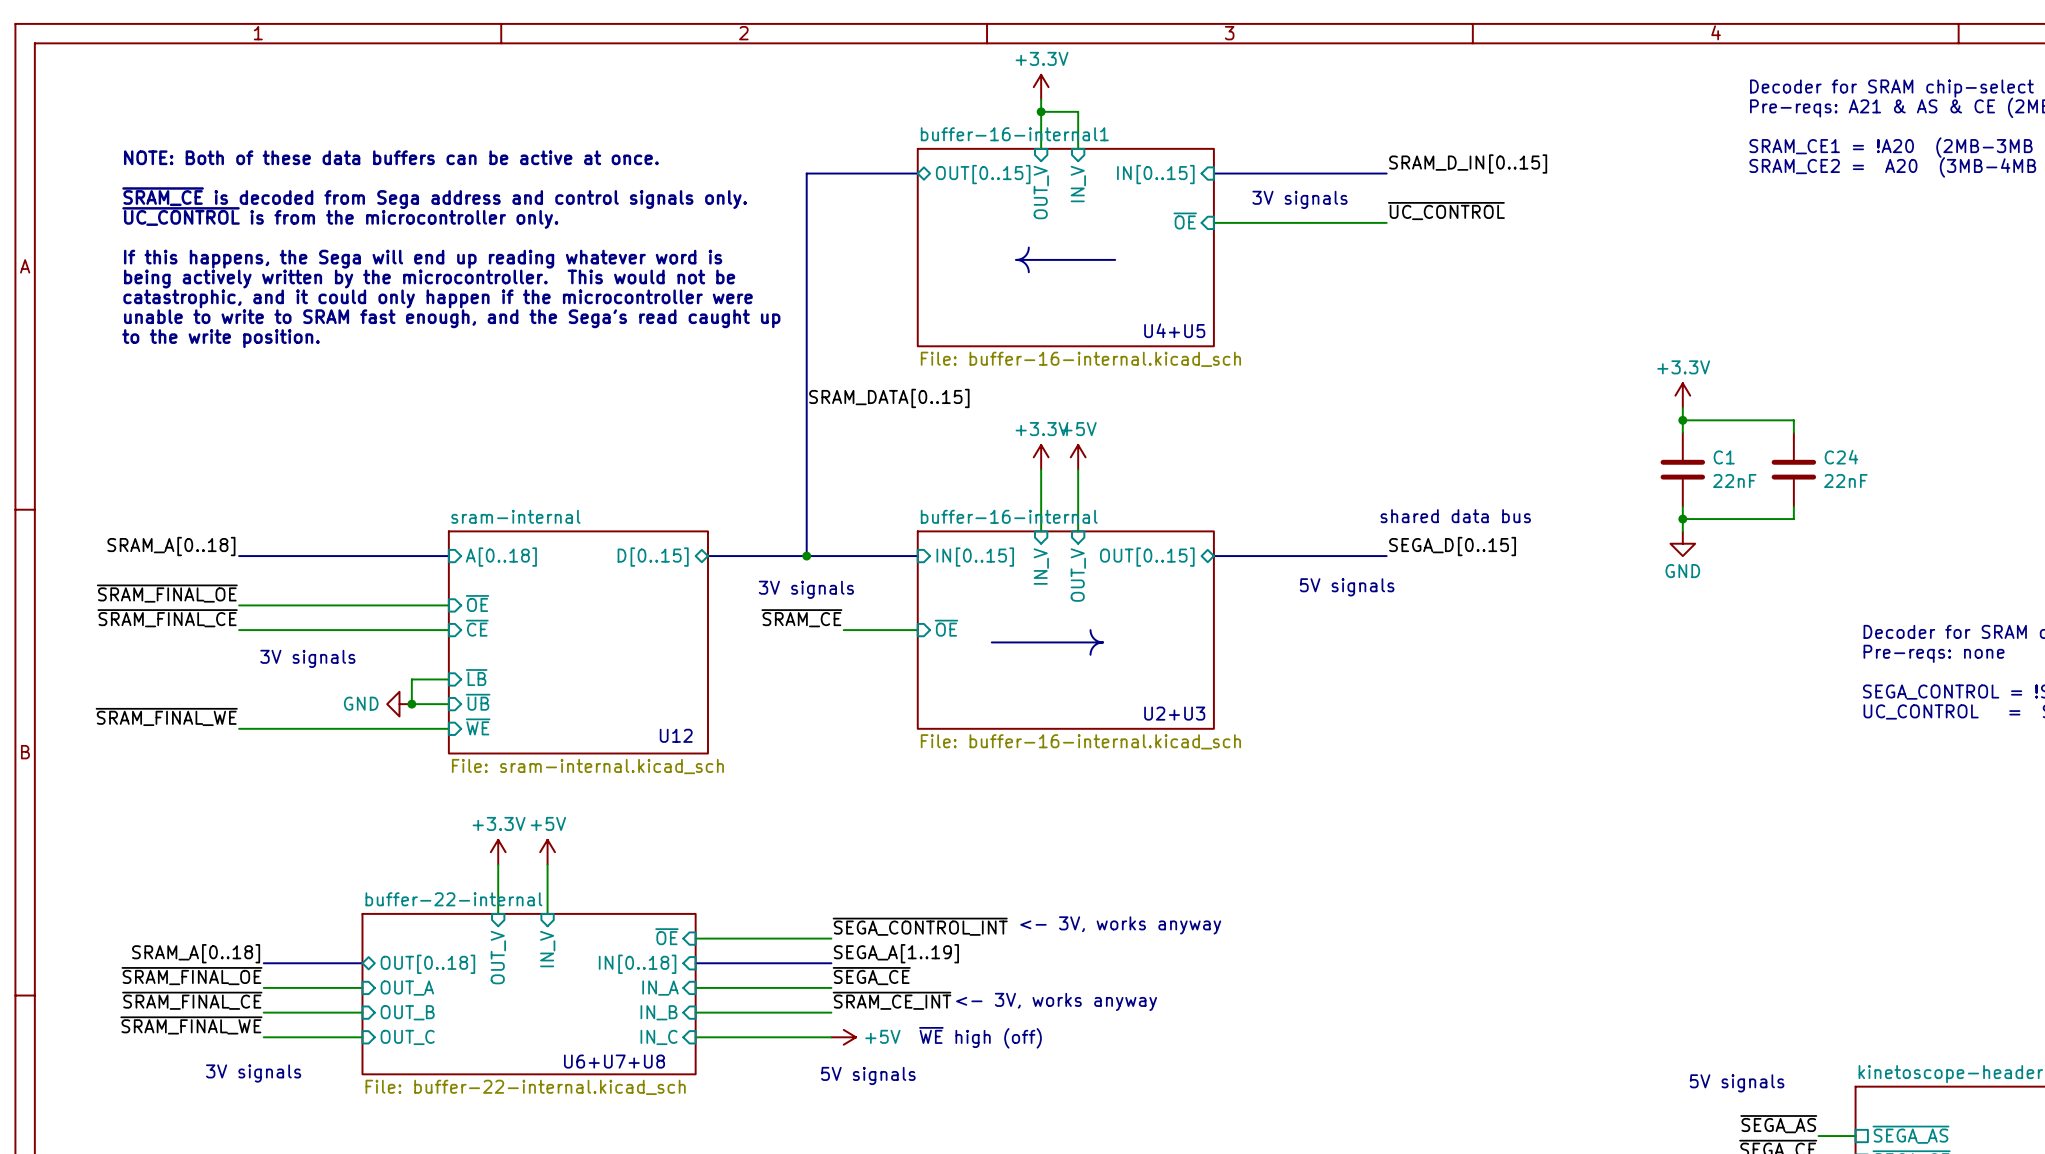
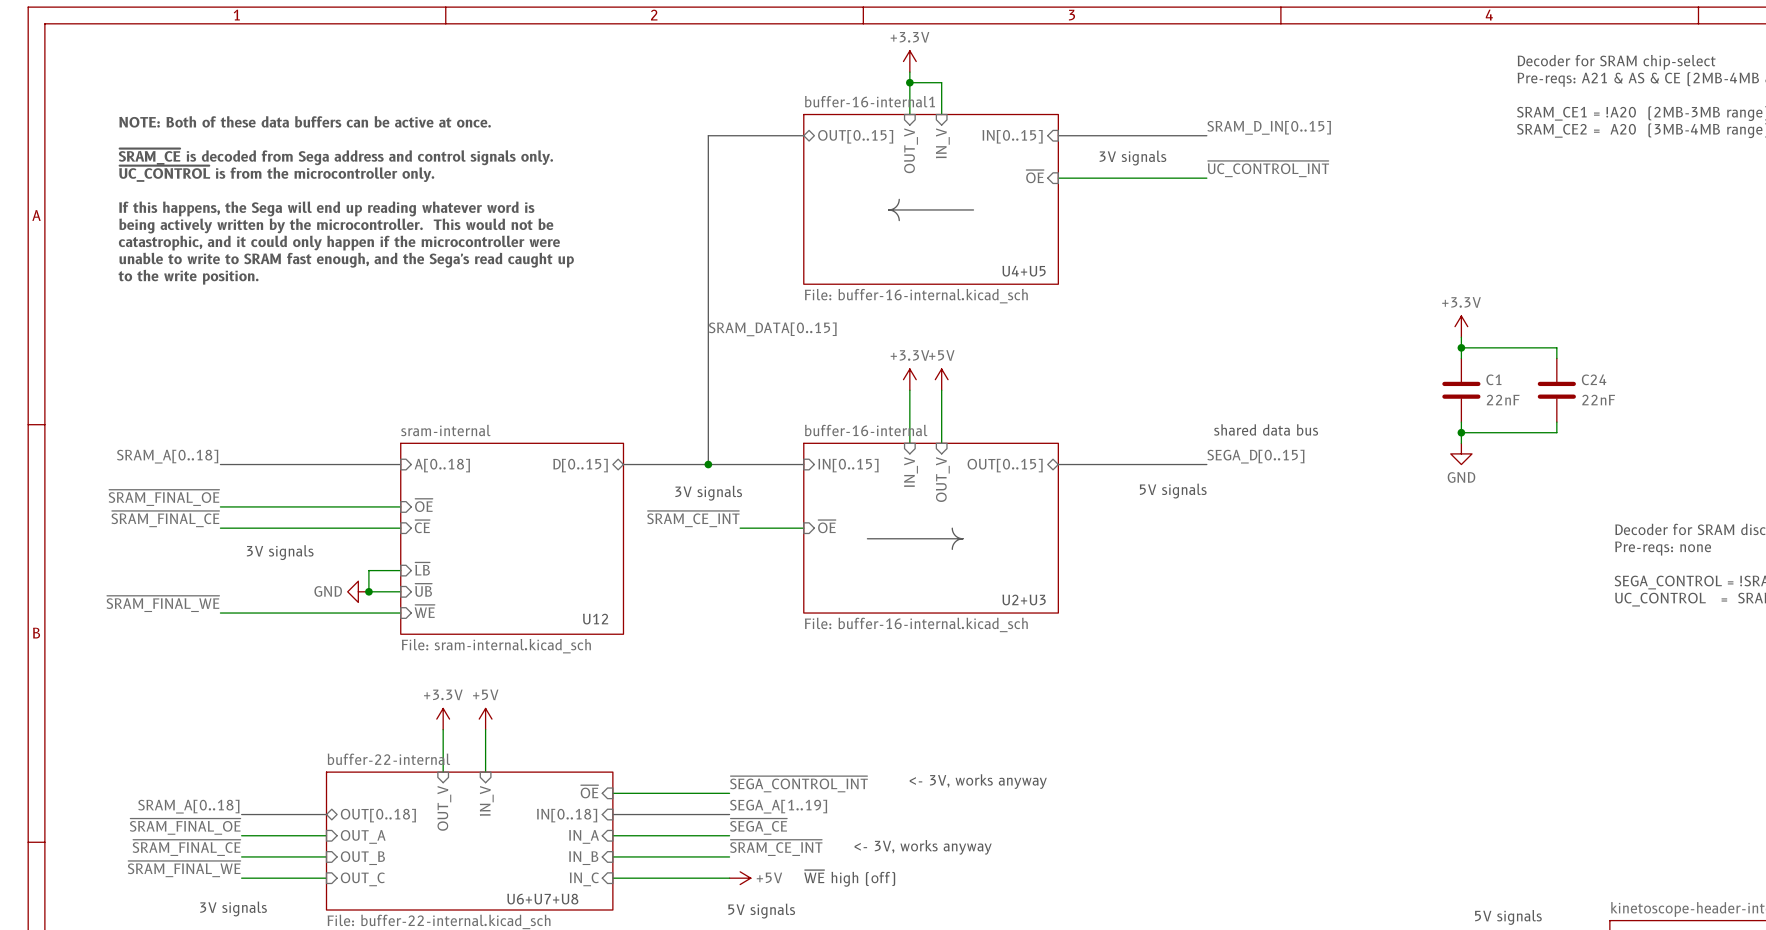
label: ~{UC_CONTROL} (1446, 211) -> ~{UC_CONTROL_INT} (1268, 169)
label: ~{SRAM_CE} (801, 618) -> ~{SRAM_CE_INT} (693, 519)

